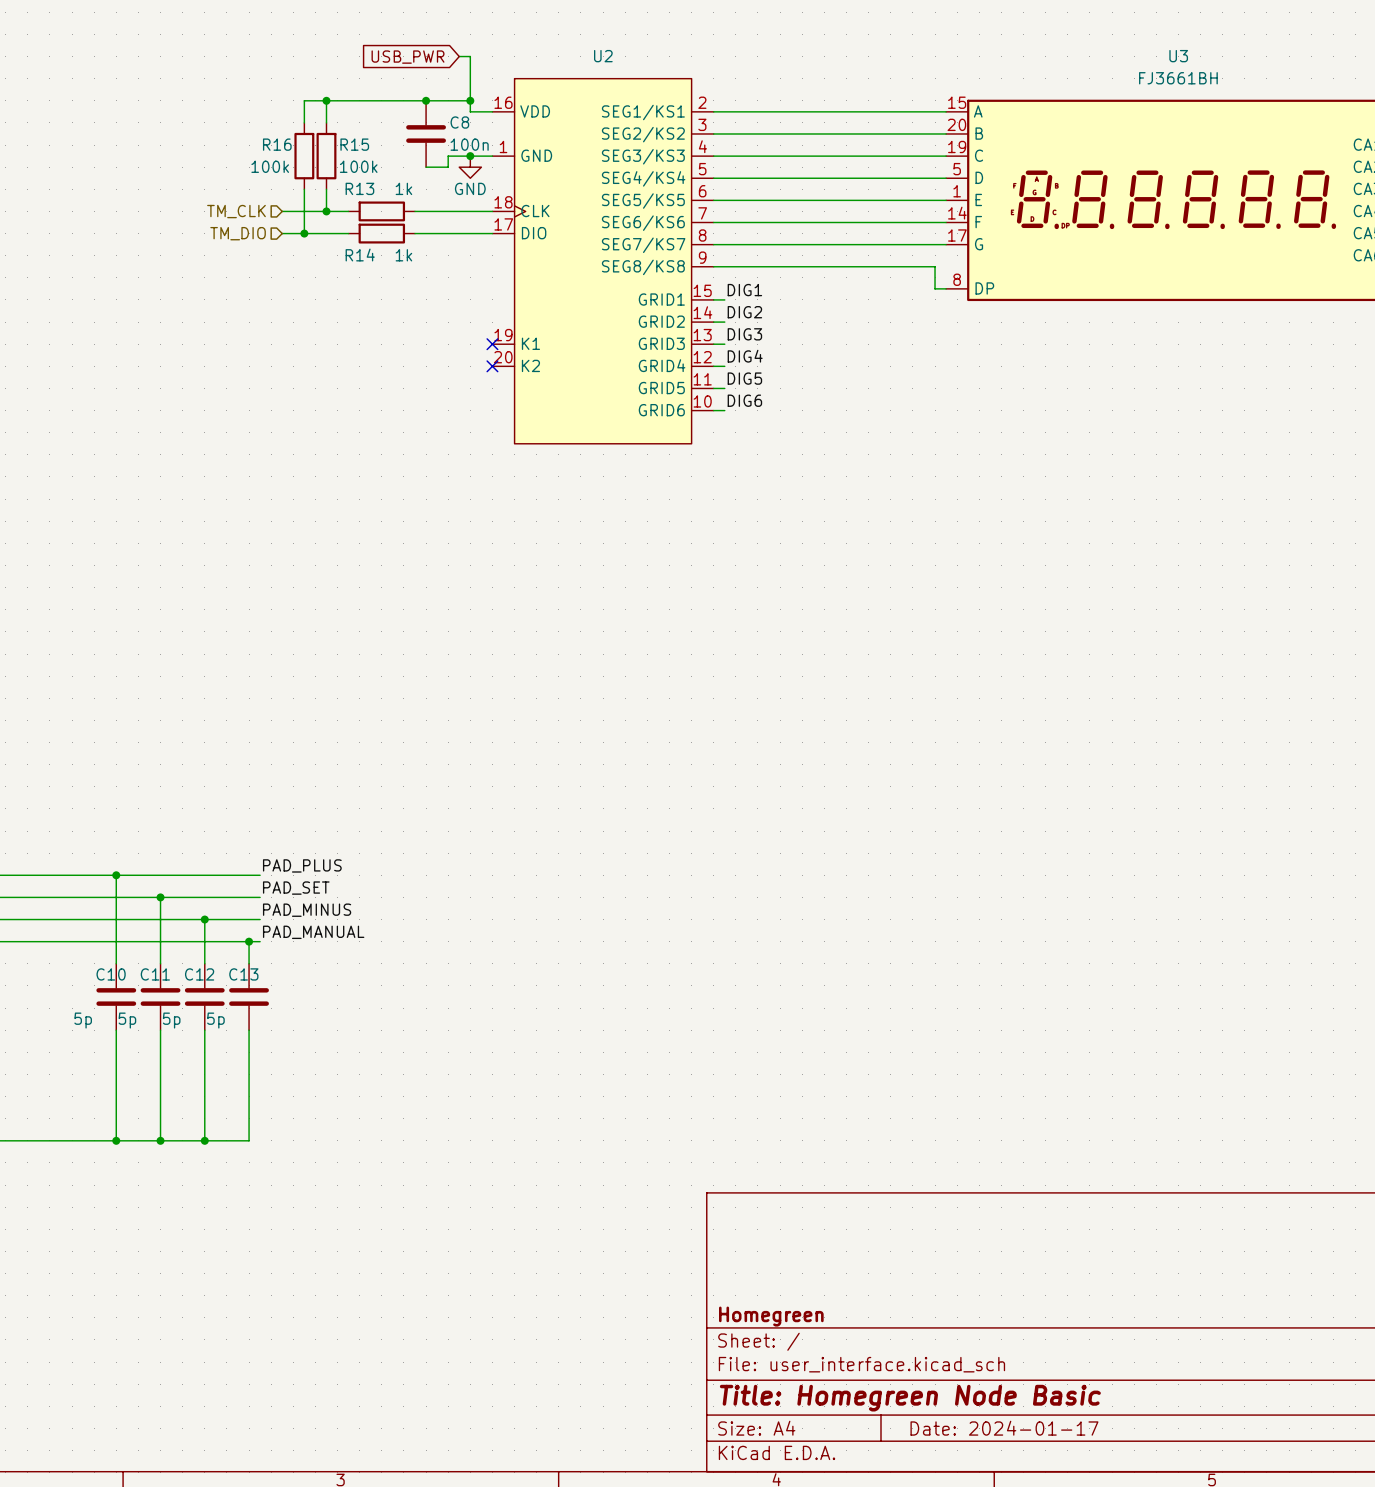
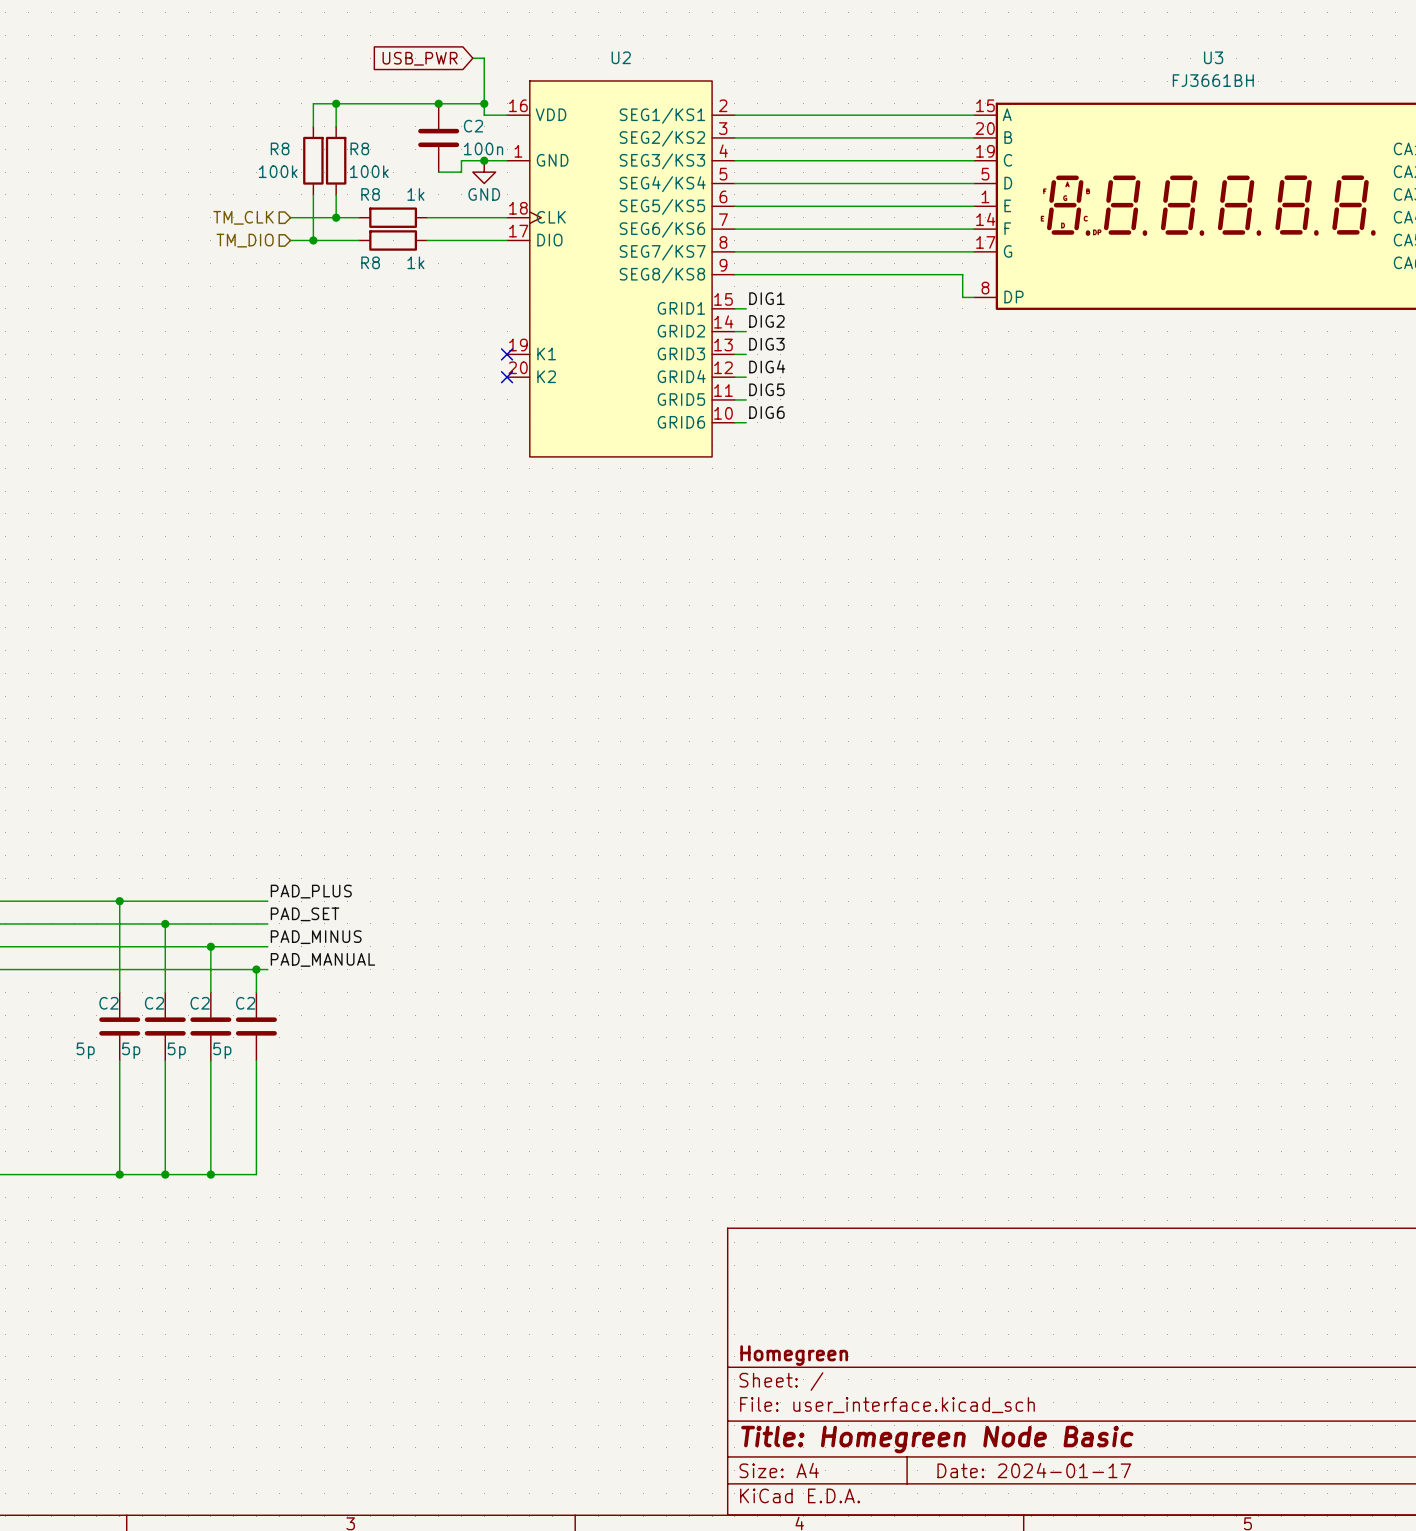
C8 name: C8 (459, 122) -> C2 (473, 126)
R16 name: R16 (277, 144) -> R8 (280, 148)
R15 name: R15 (354, 144) -> R8 (359, 148)
R13 name: R13 (359, 188) -> R8 (370, 194)
R14 name: R14 (360, 255) -> R8 (370, 262)
C10 name: C10 (111, 974) -> C2 (108, 1003)
C11 name: C11 (155, 974) -> C2 (154, 1003)
C12 name: C12 (199, 974) -> C2 (200, 1003)
C13 name: C13 (243, 974) -> C2 (245, 1003)

